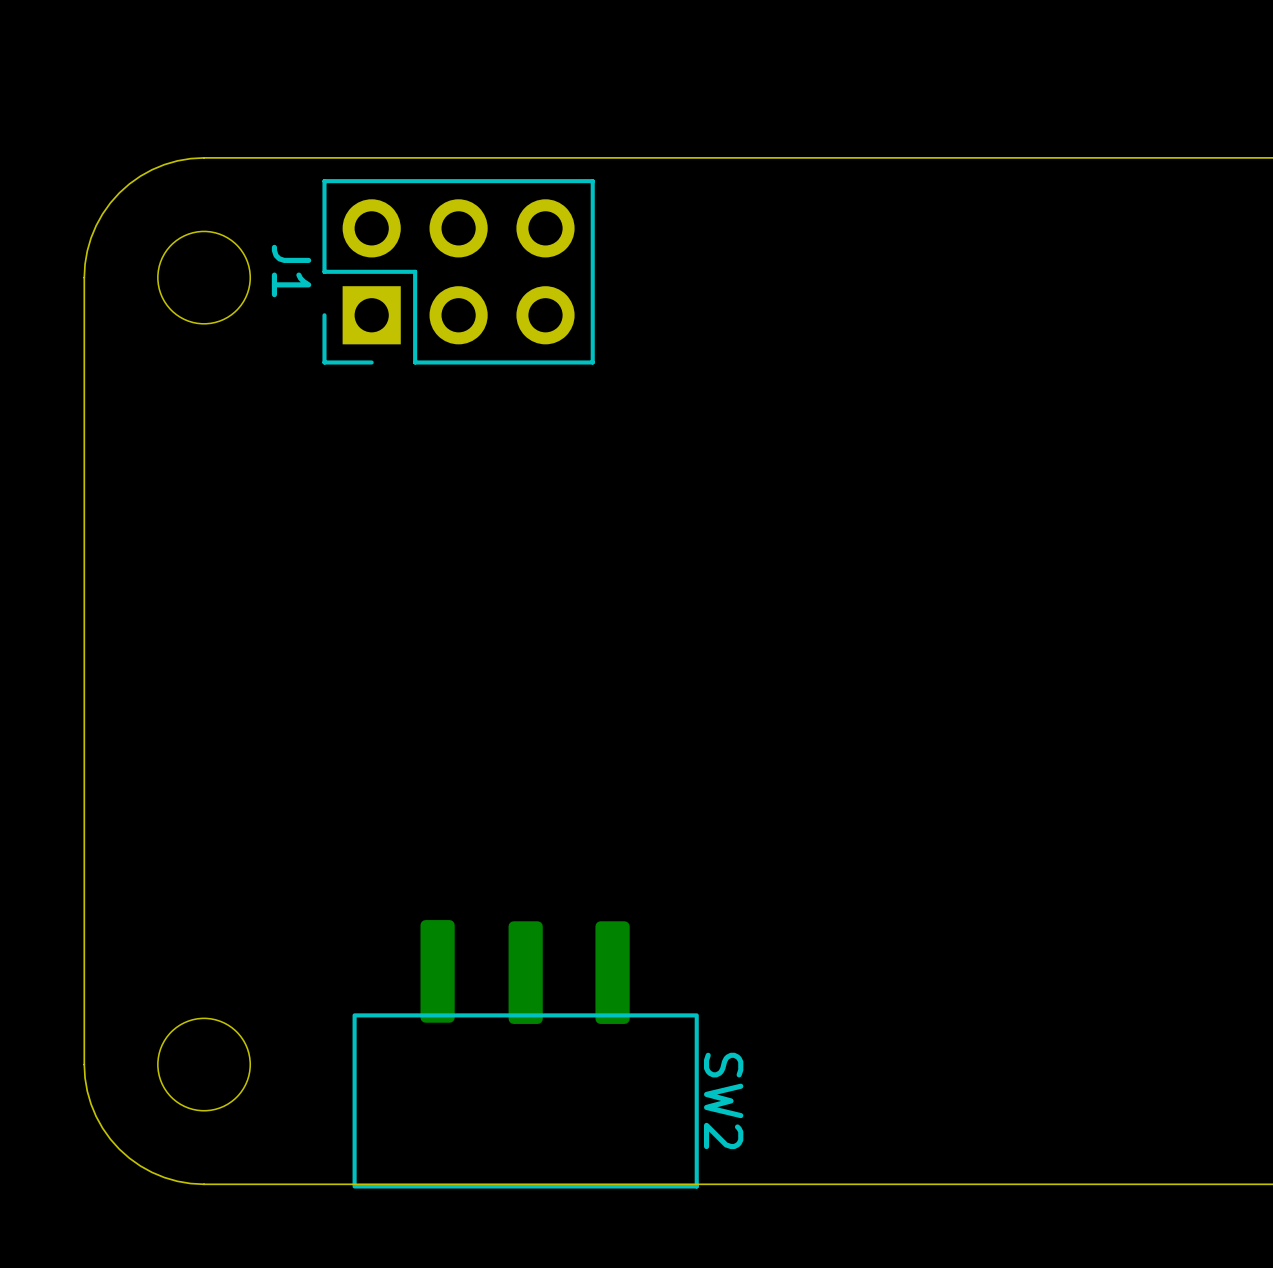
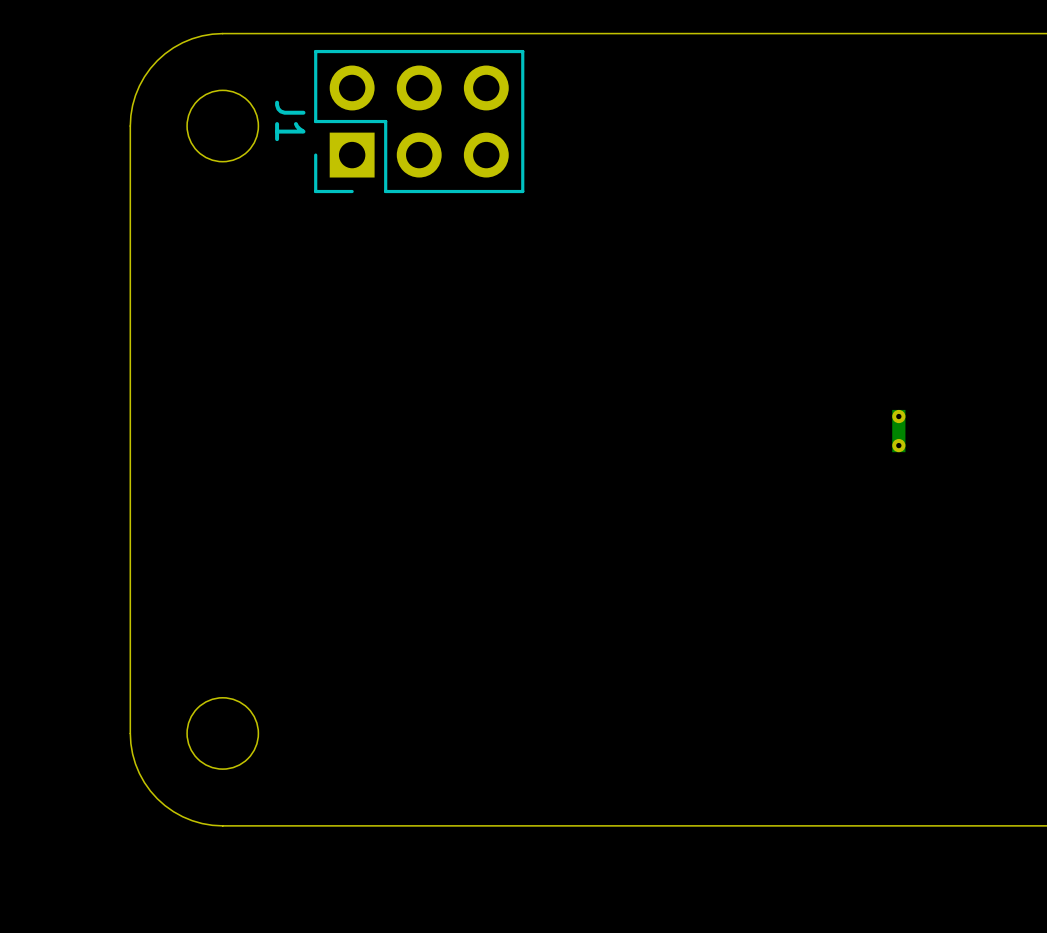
part: none -> (898, 431)
SW2: (525, 1054) -> none

